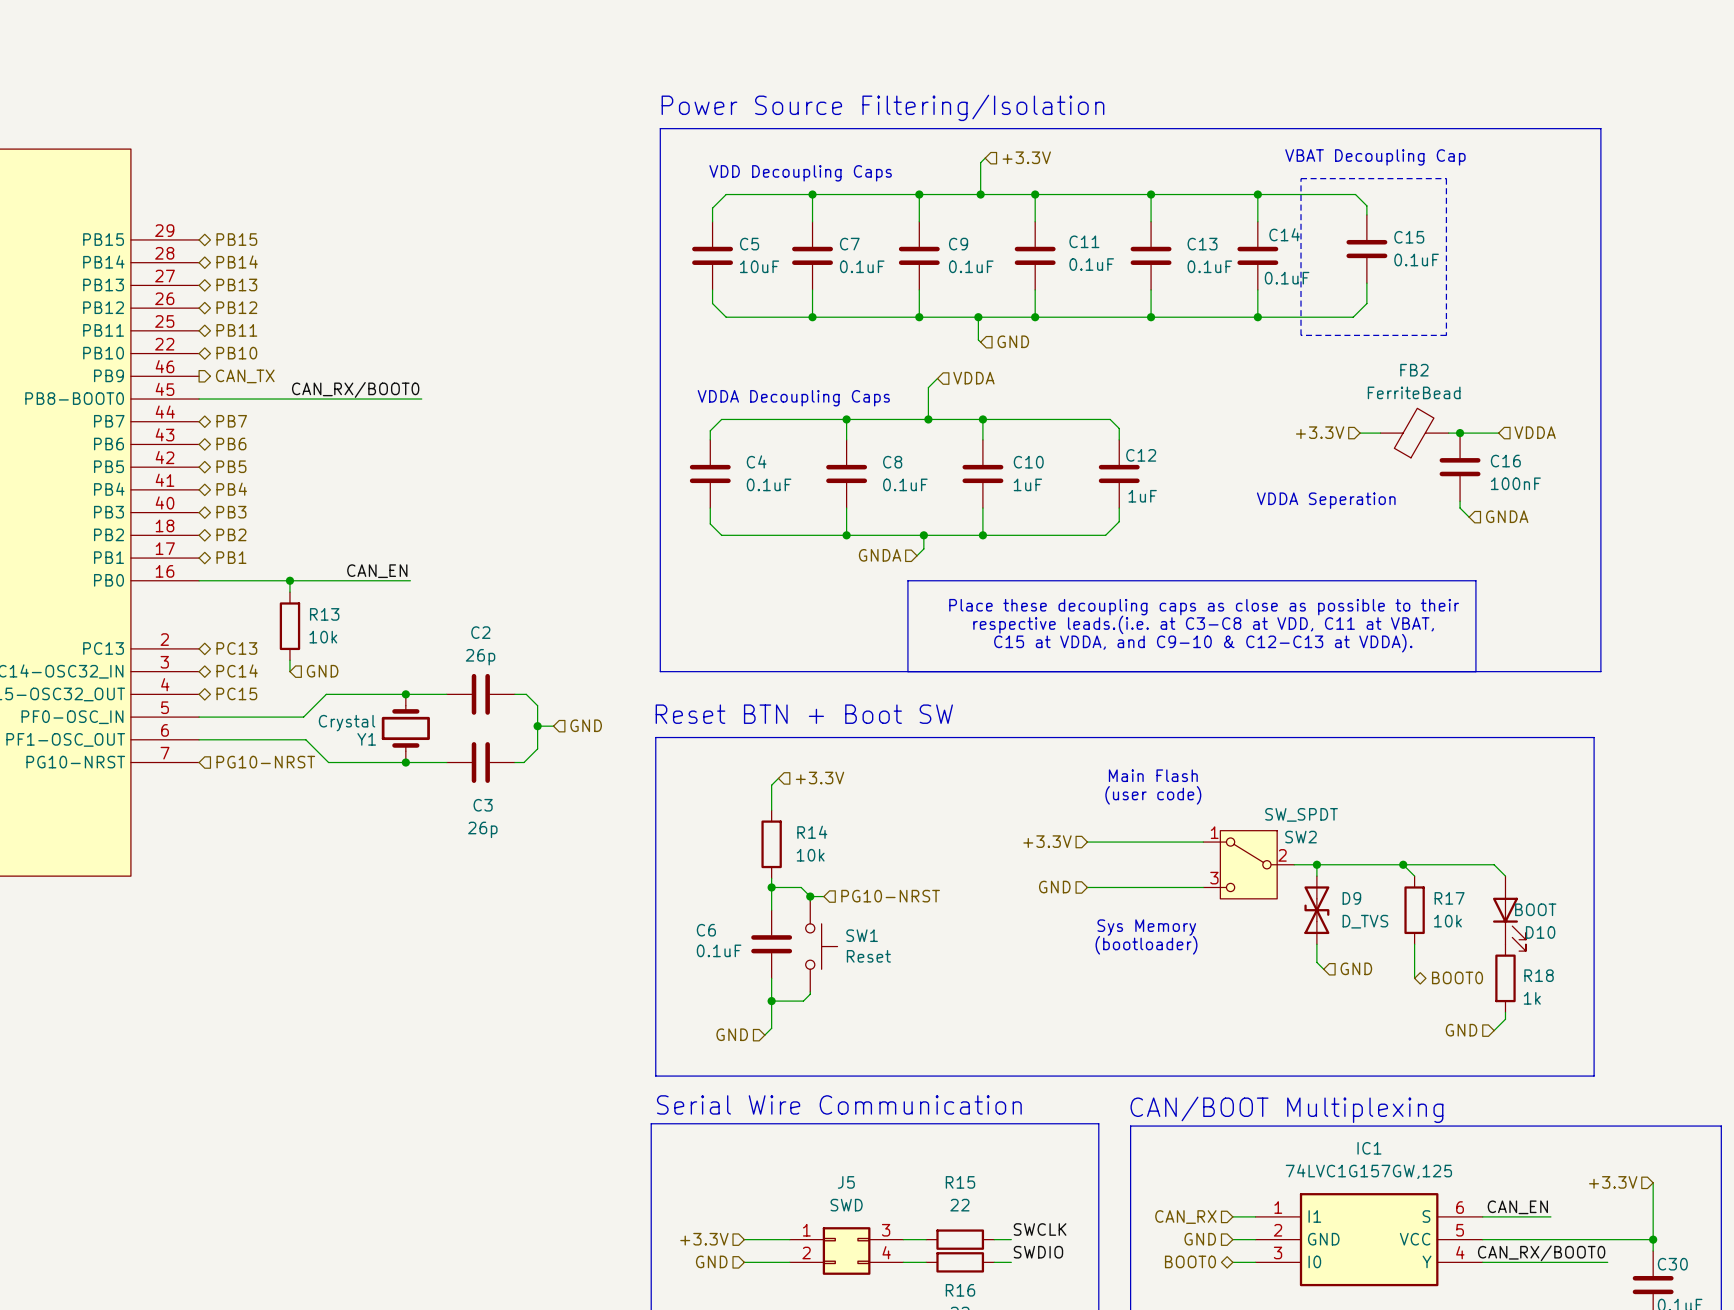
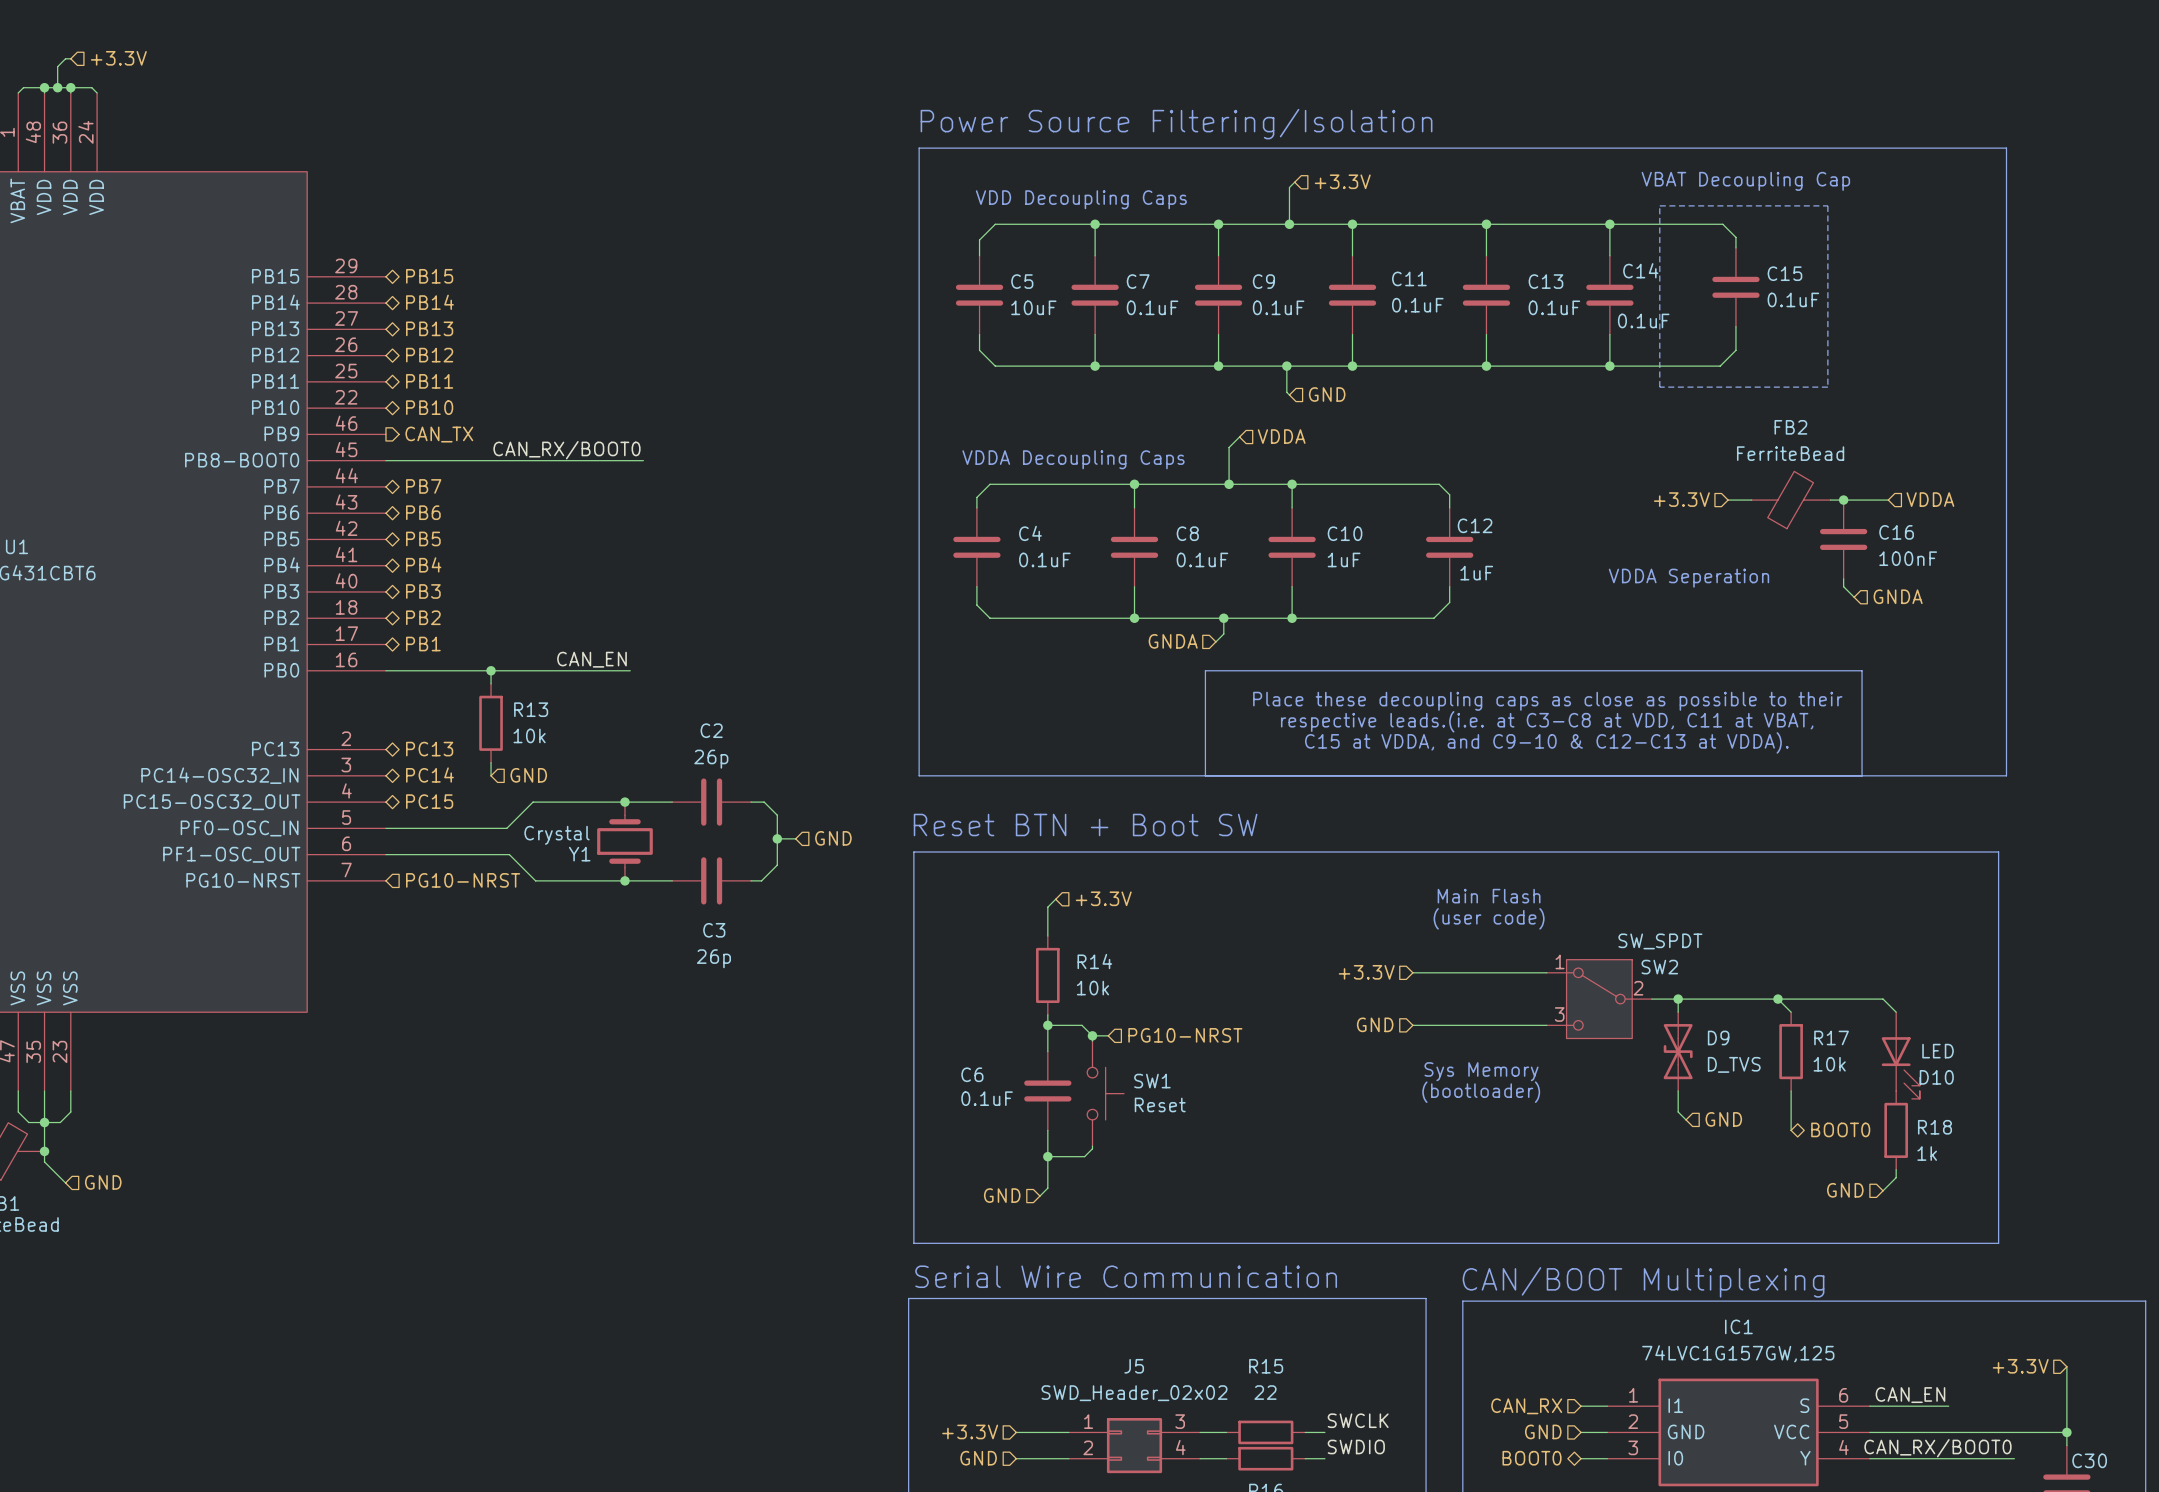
D10 value: BOOT (1535, 909) -> LED (1938, 1051)
J5 value: SWD (846, 1205) -> SWD_Header_02x02 (1134, 1393)

